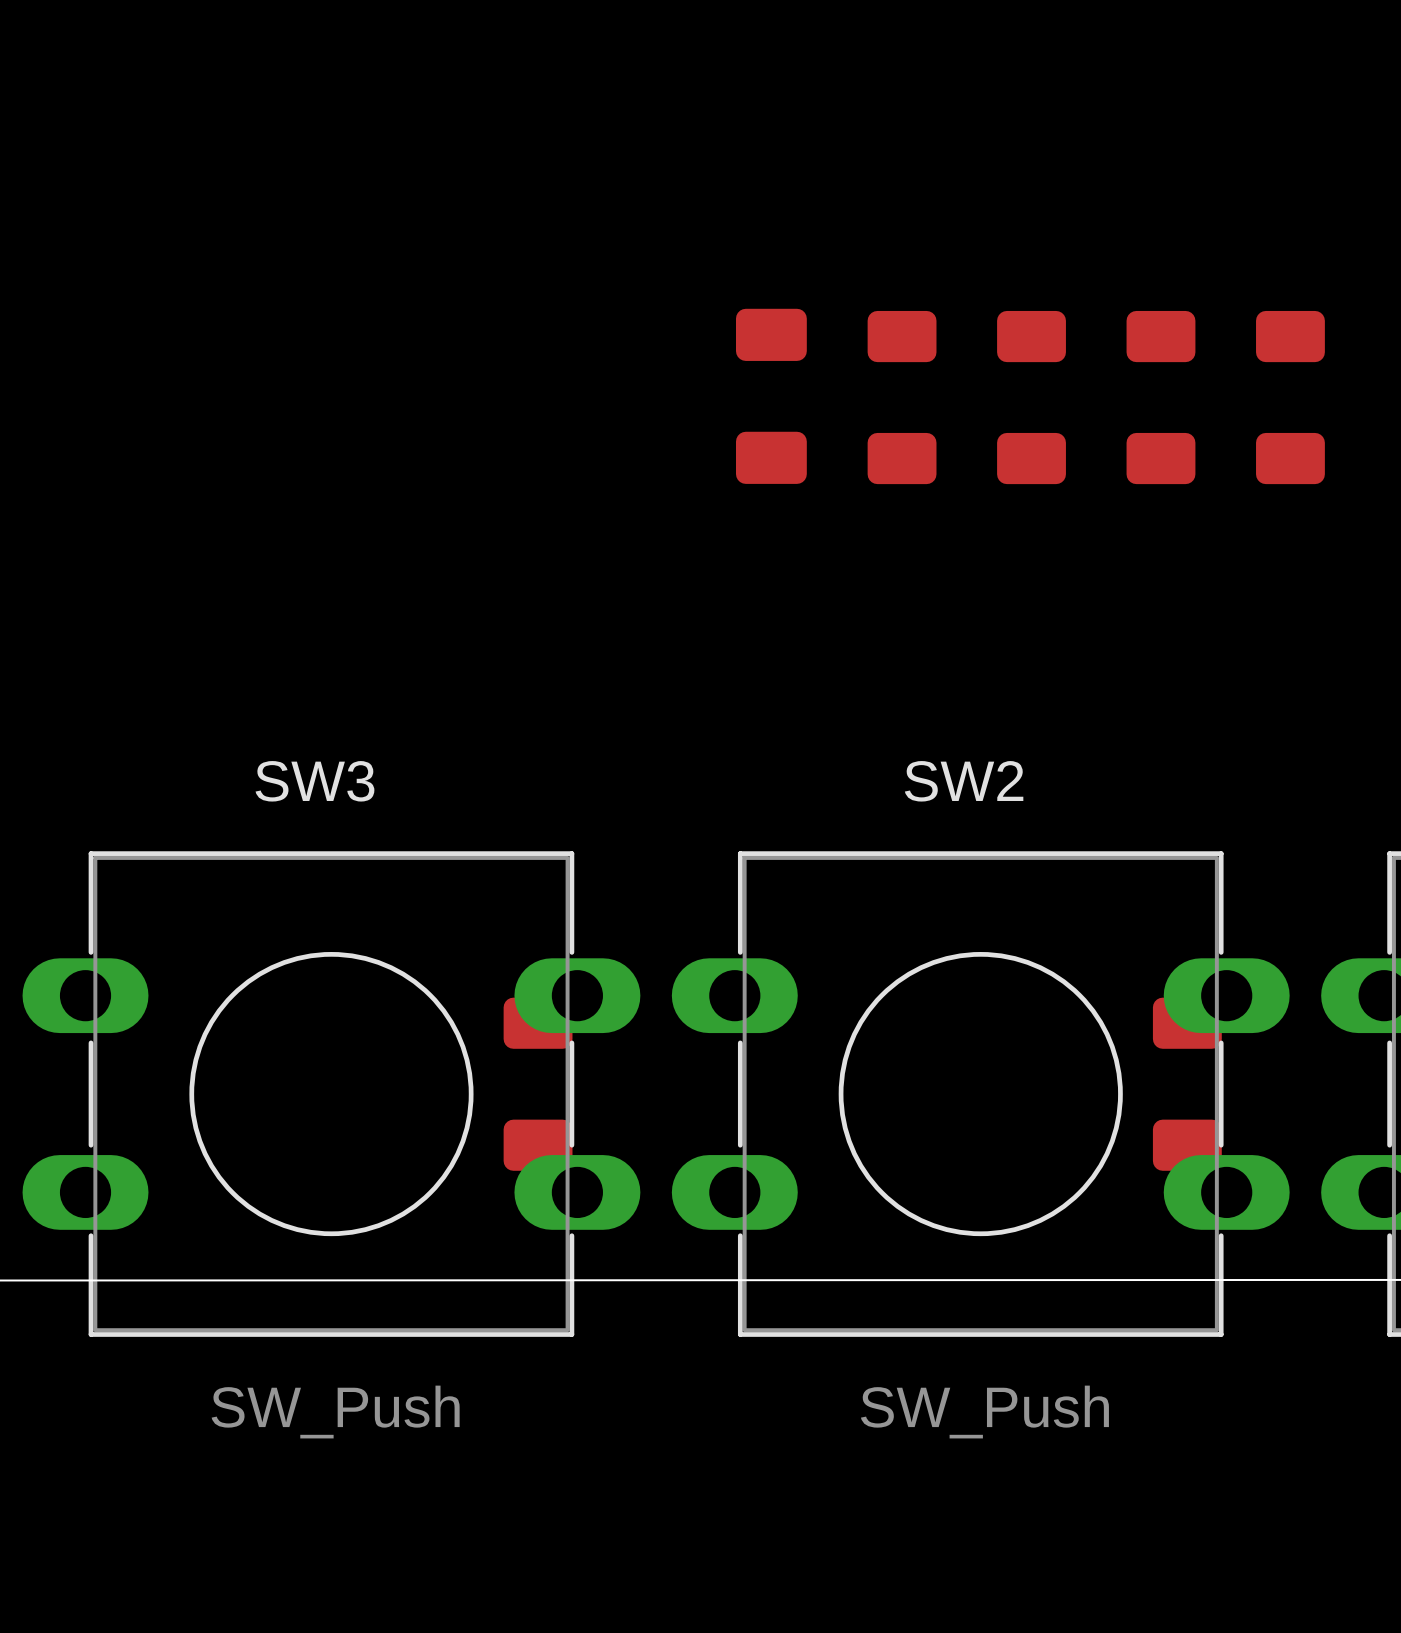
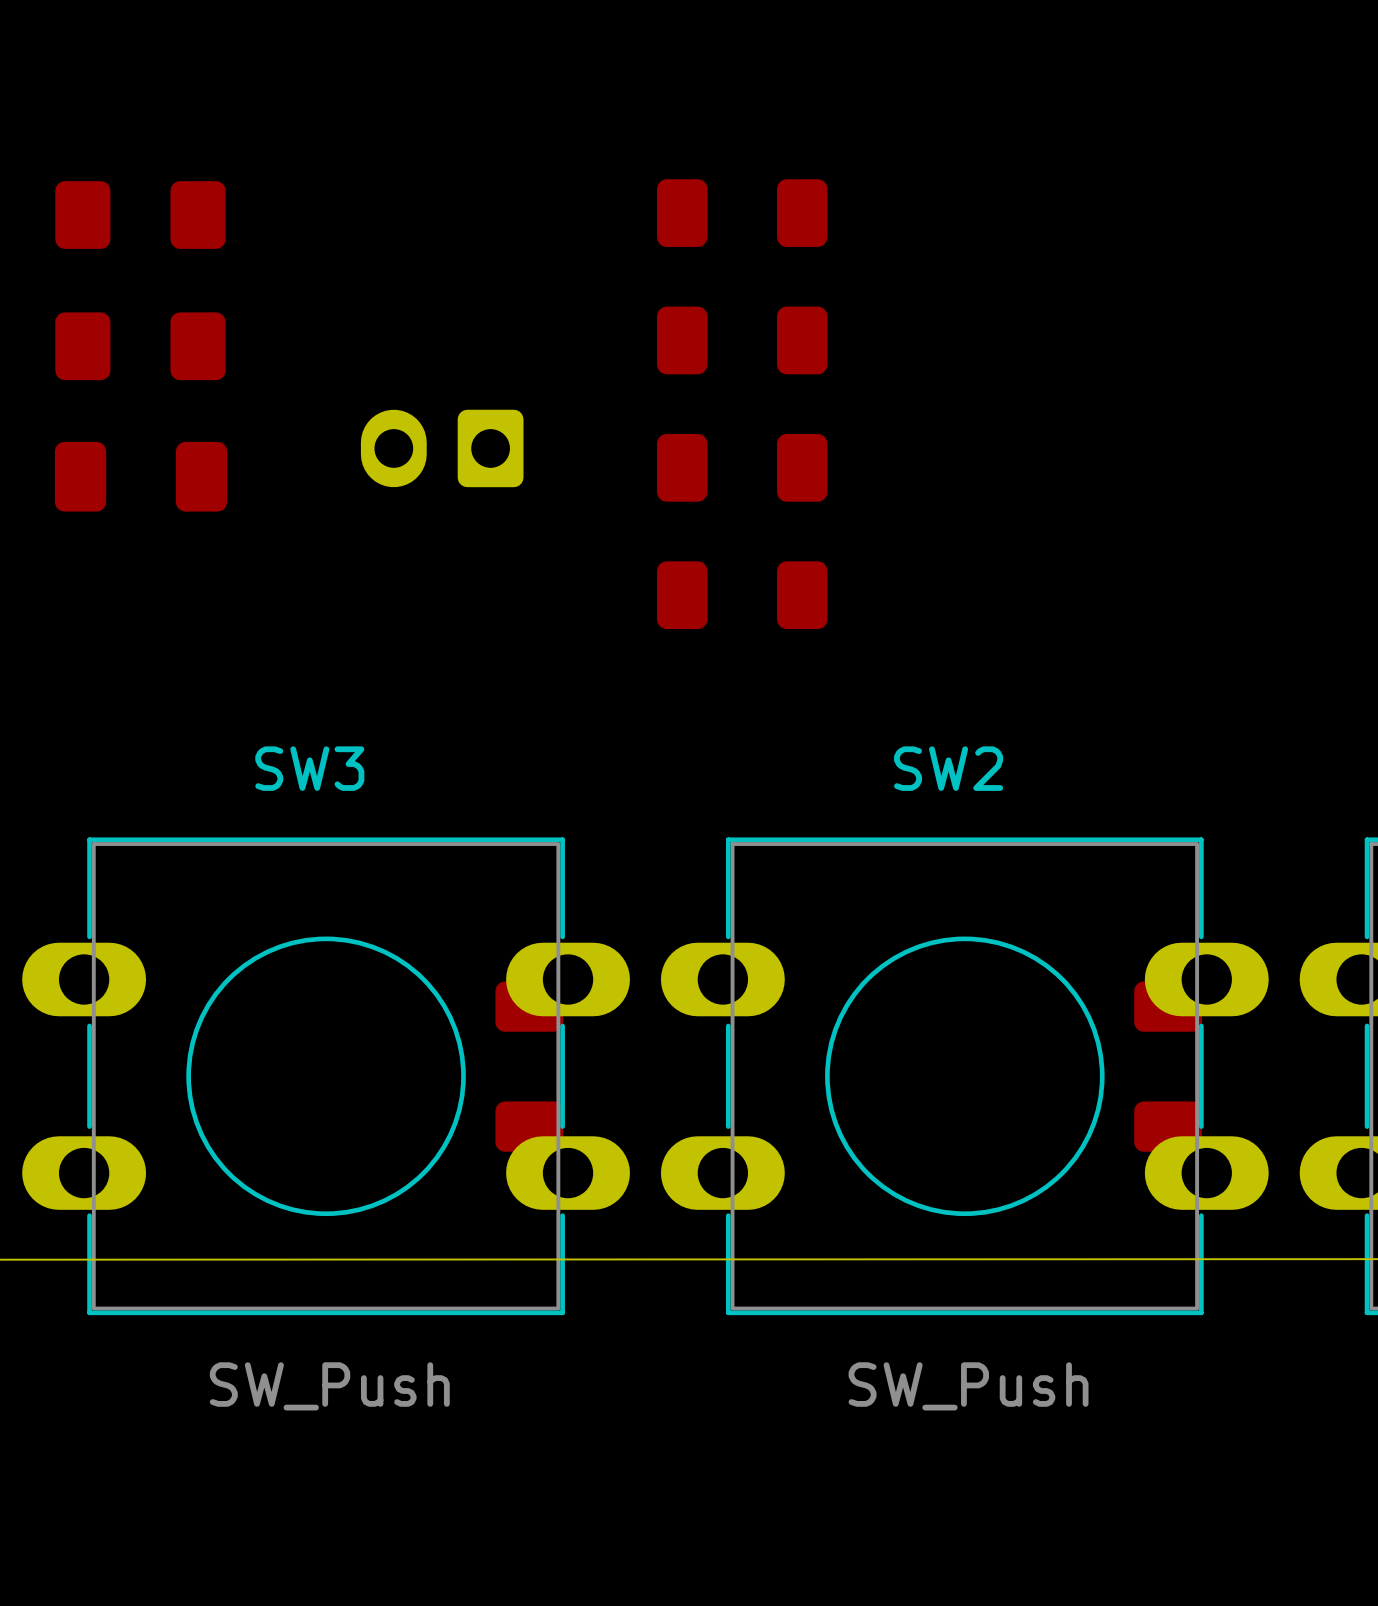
part: none -> (742, 213)
part: none -> (140, 215)
part: none -> (742, 340)
part: none -> (140, 346)
part rotation: 0° (771, 396) -> 90° clockwise (141, 476)
part position: (771, 396) -> (141, 476)
part: (902, 397) -> none
part: (1031, 397) -> none
part: (1160, 397) -> none
part: (1290, 397) -> none
part: none -> (442, 448)
part: none -> (742, 467)
part: none -> (742, 595)

